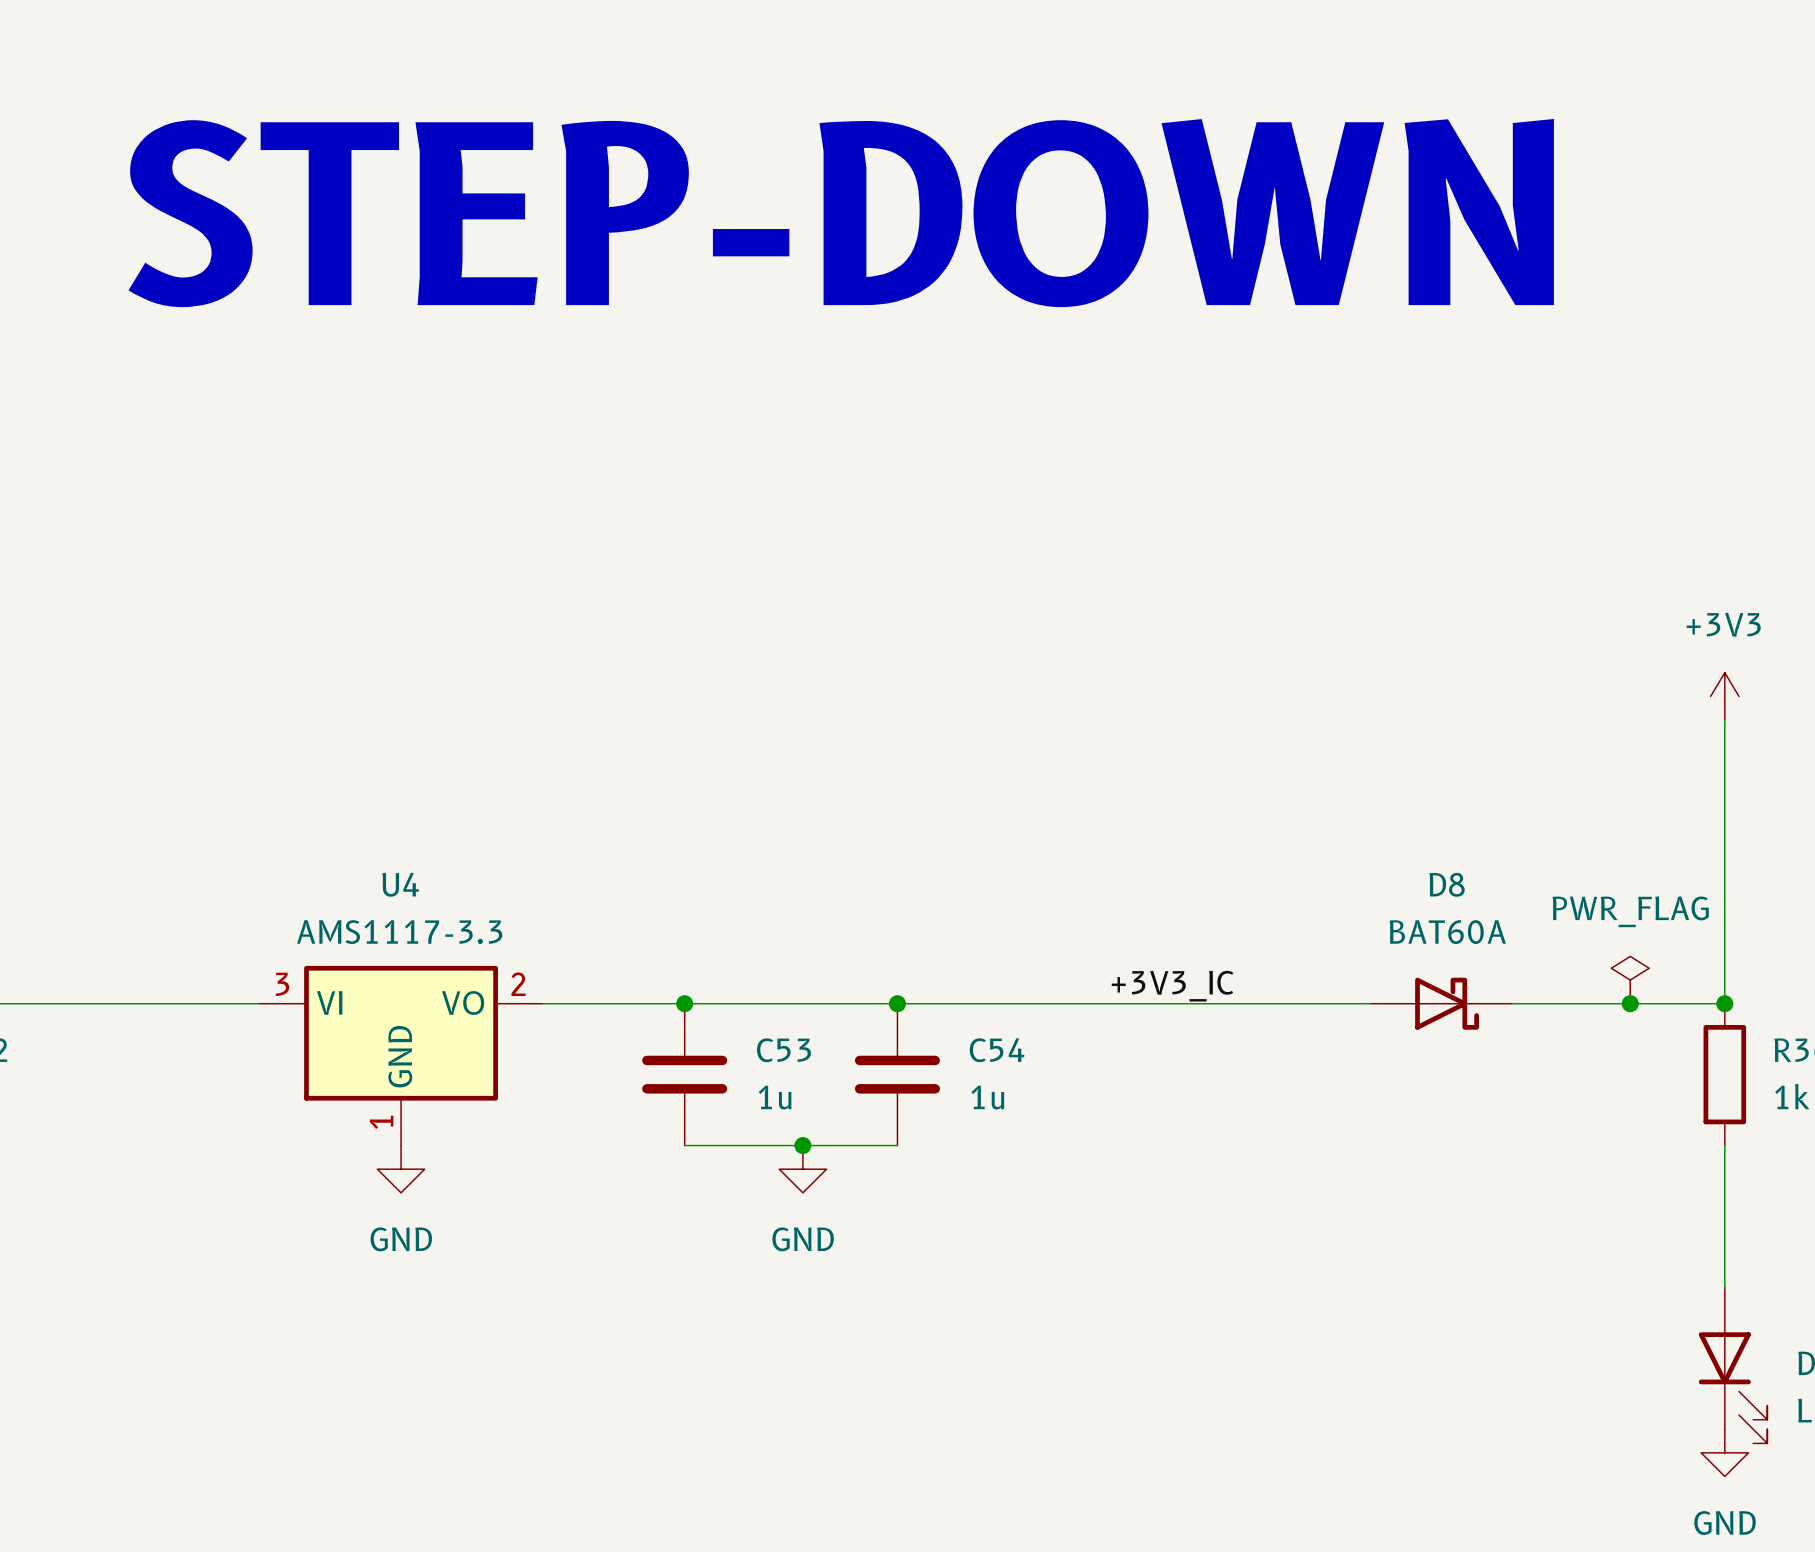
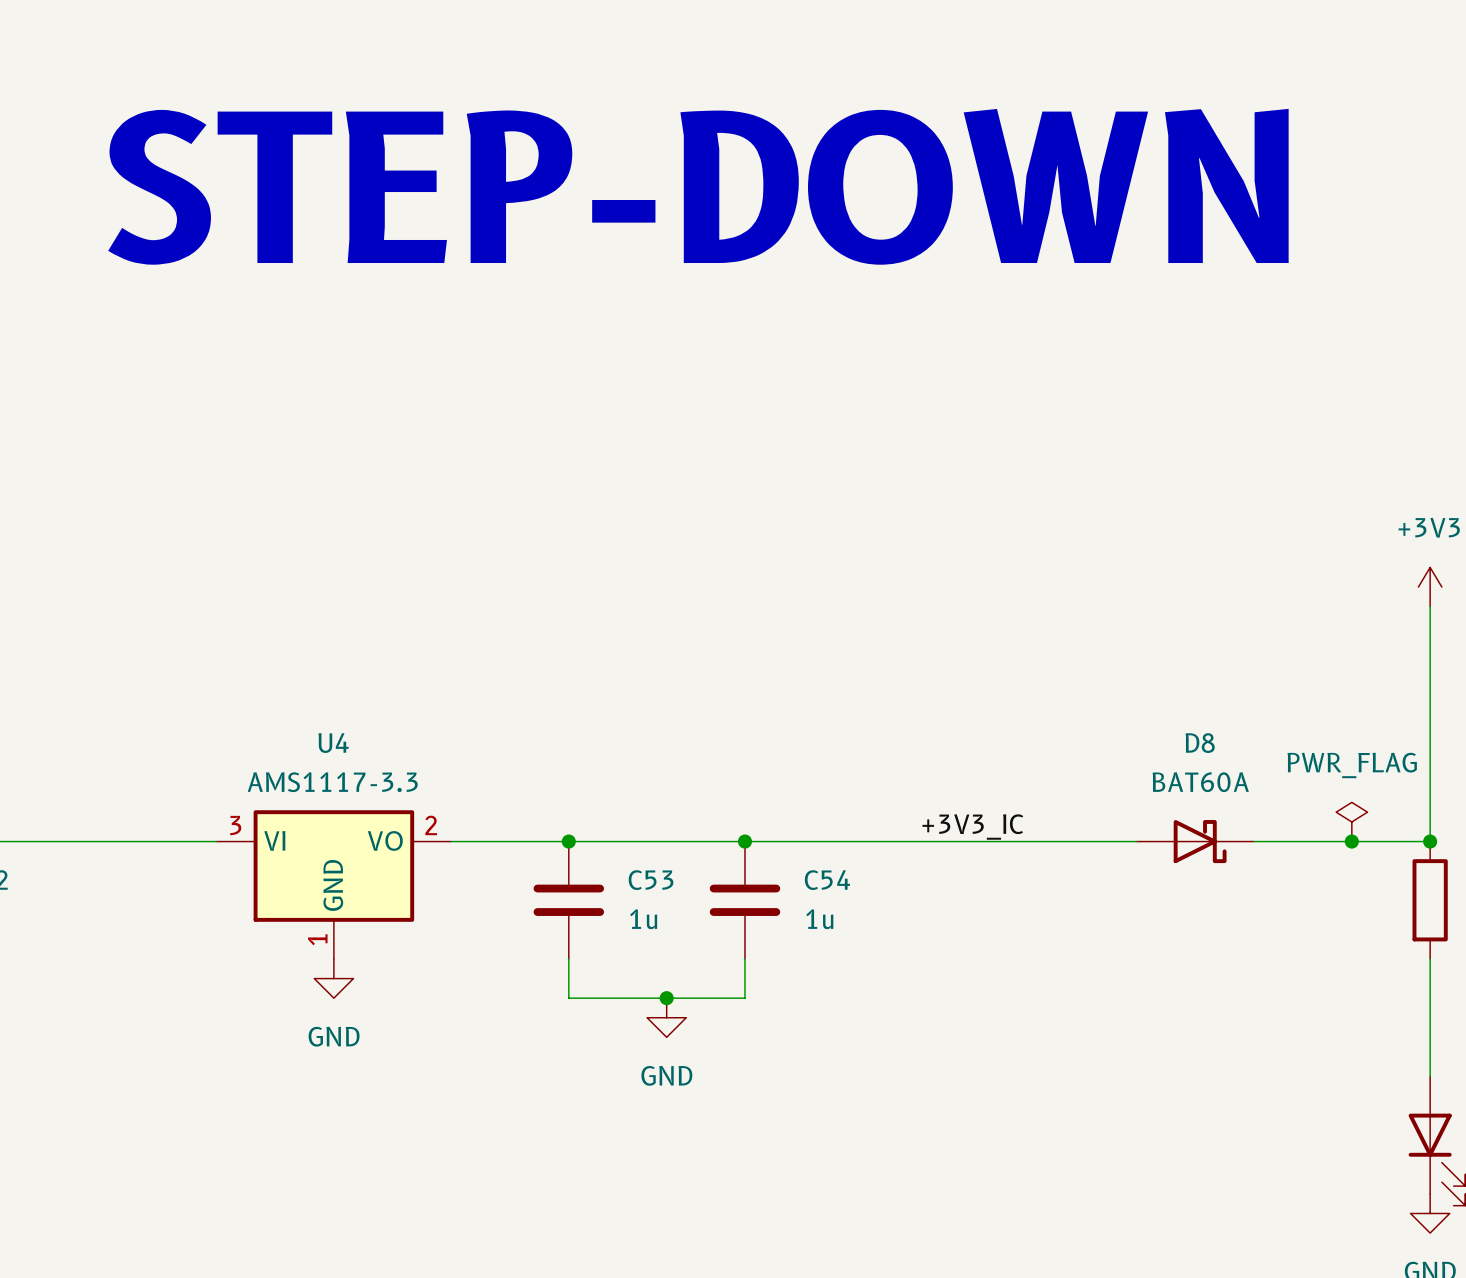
wire: (684, 1145) (897, 1145) -> (568, 959) (568, 998) (744, 998) (744, 959)
junction position: (802, 1145) -> (666, 998)
power symbol position: GND (802, 1169) -> GND (666, 1017)

